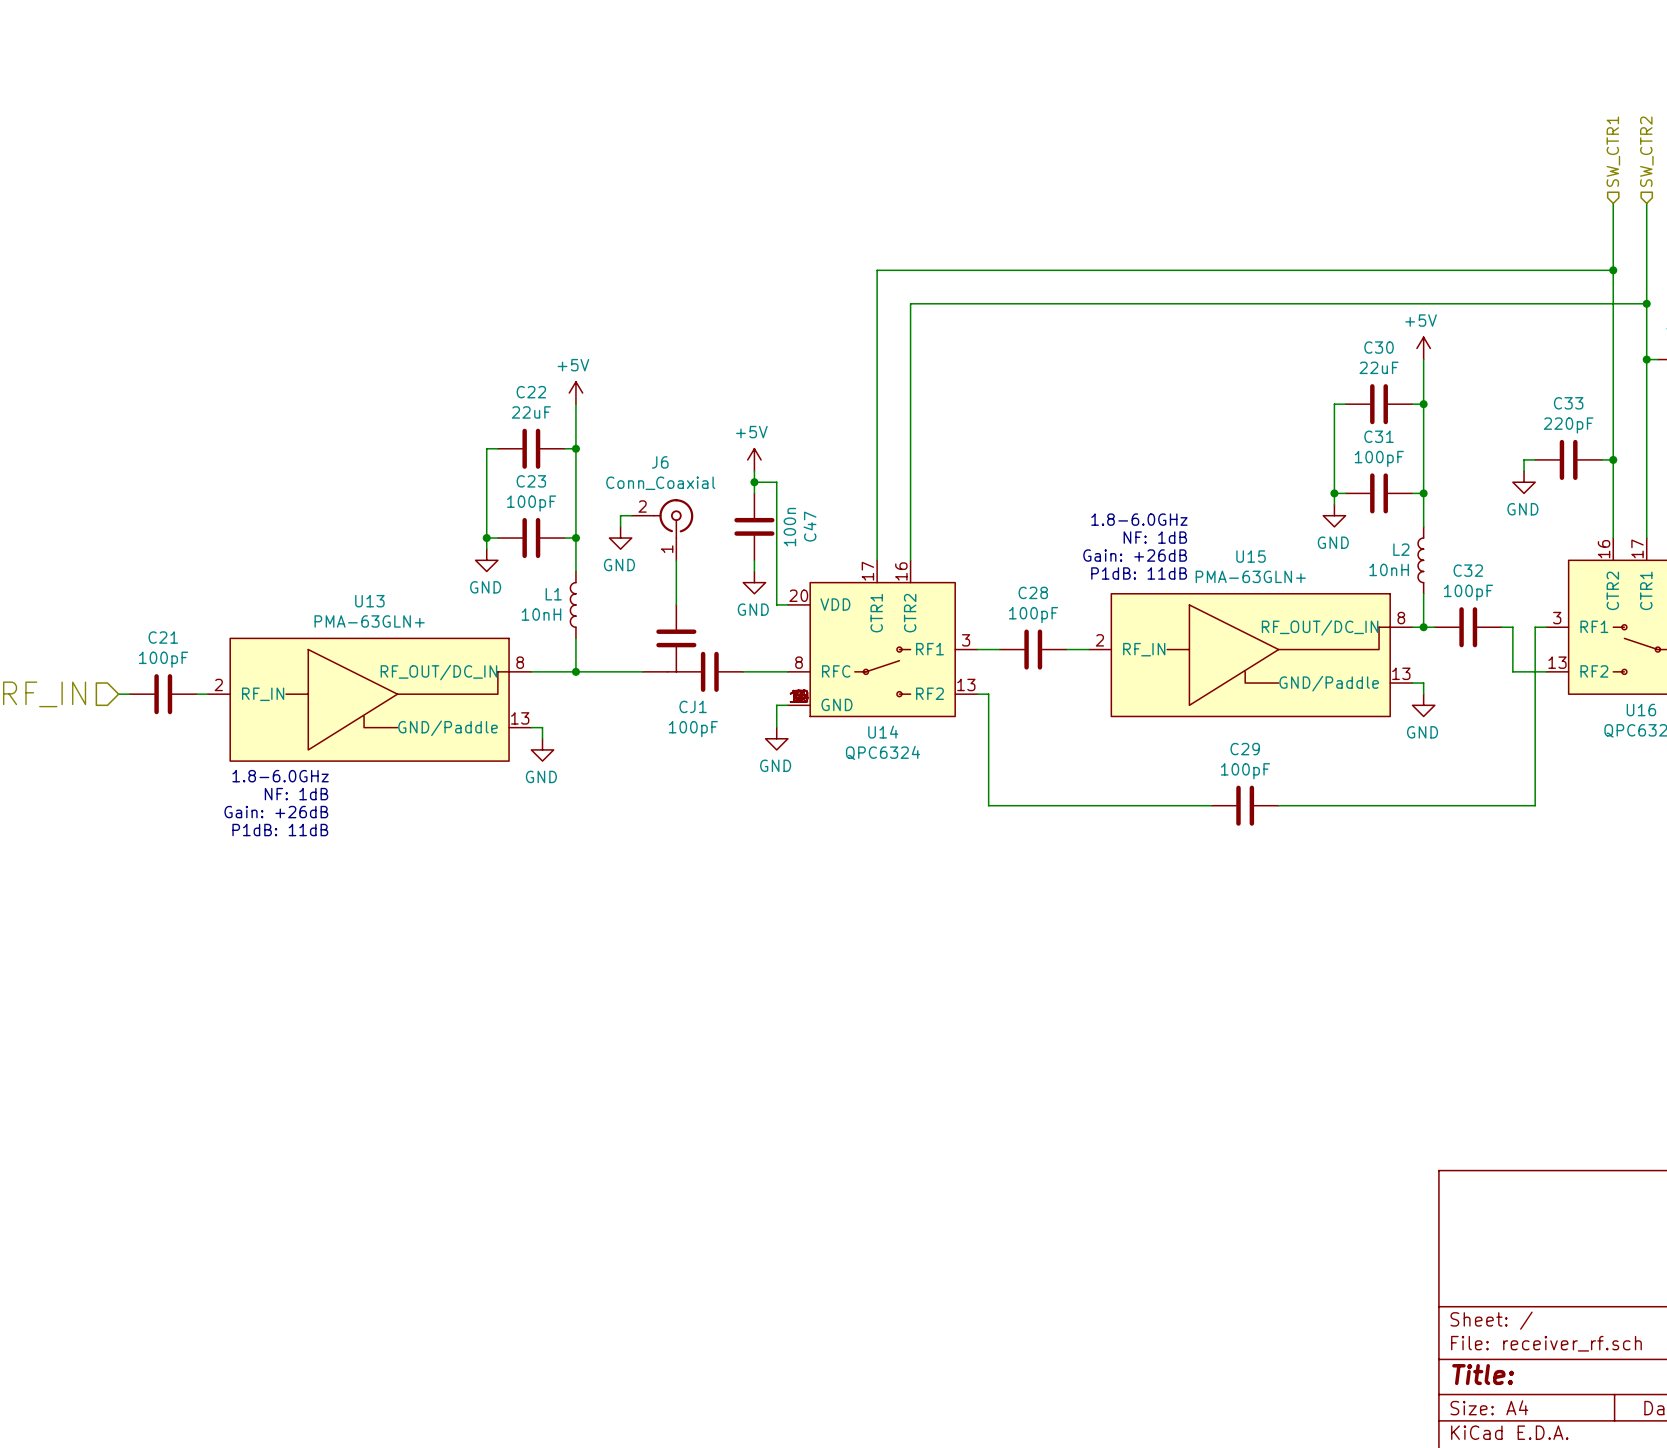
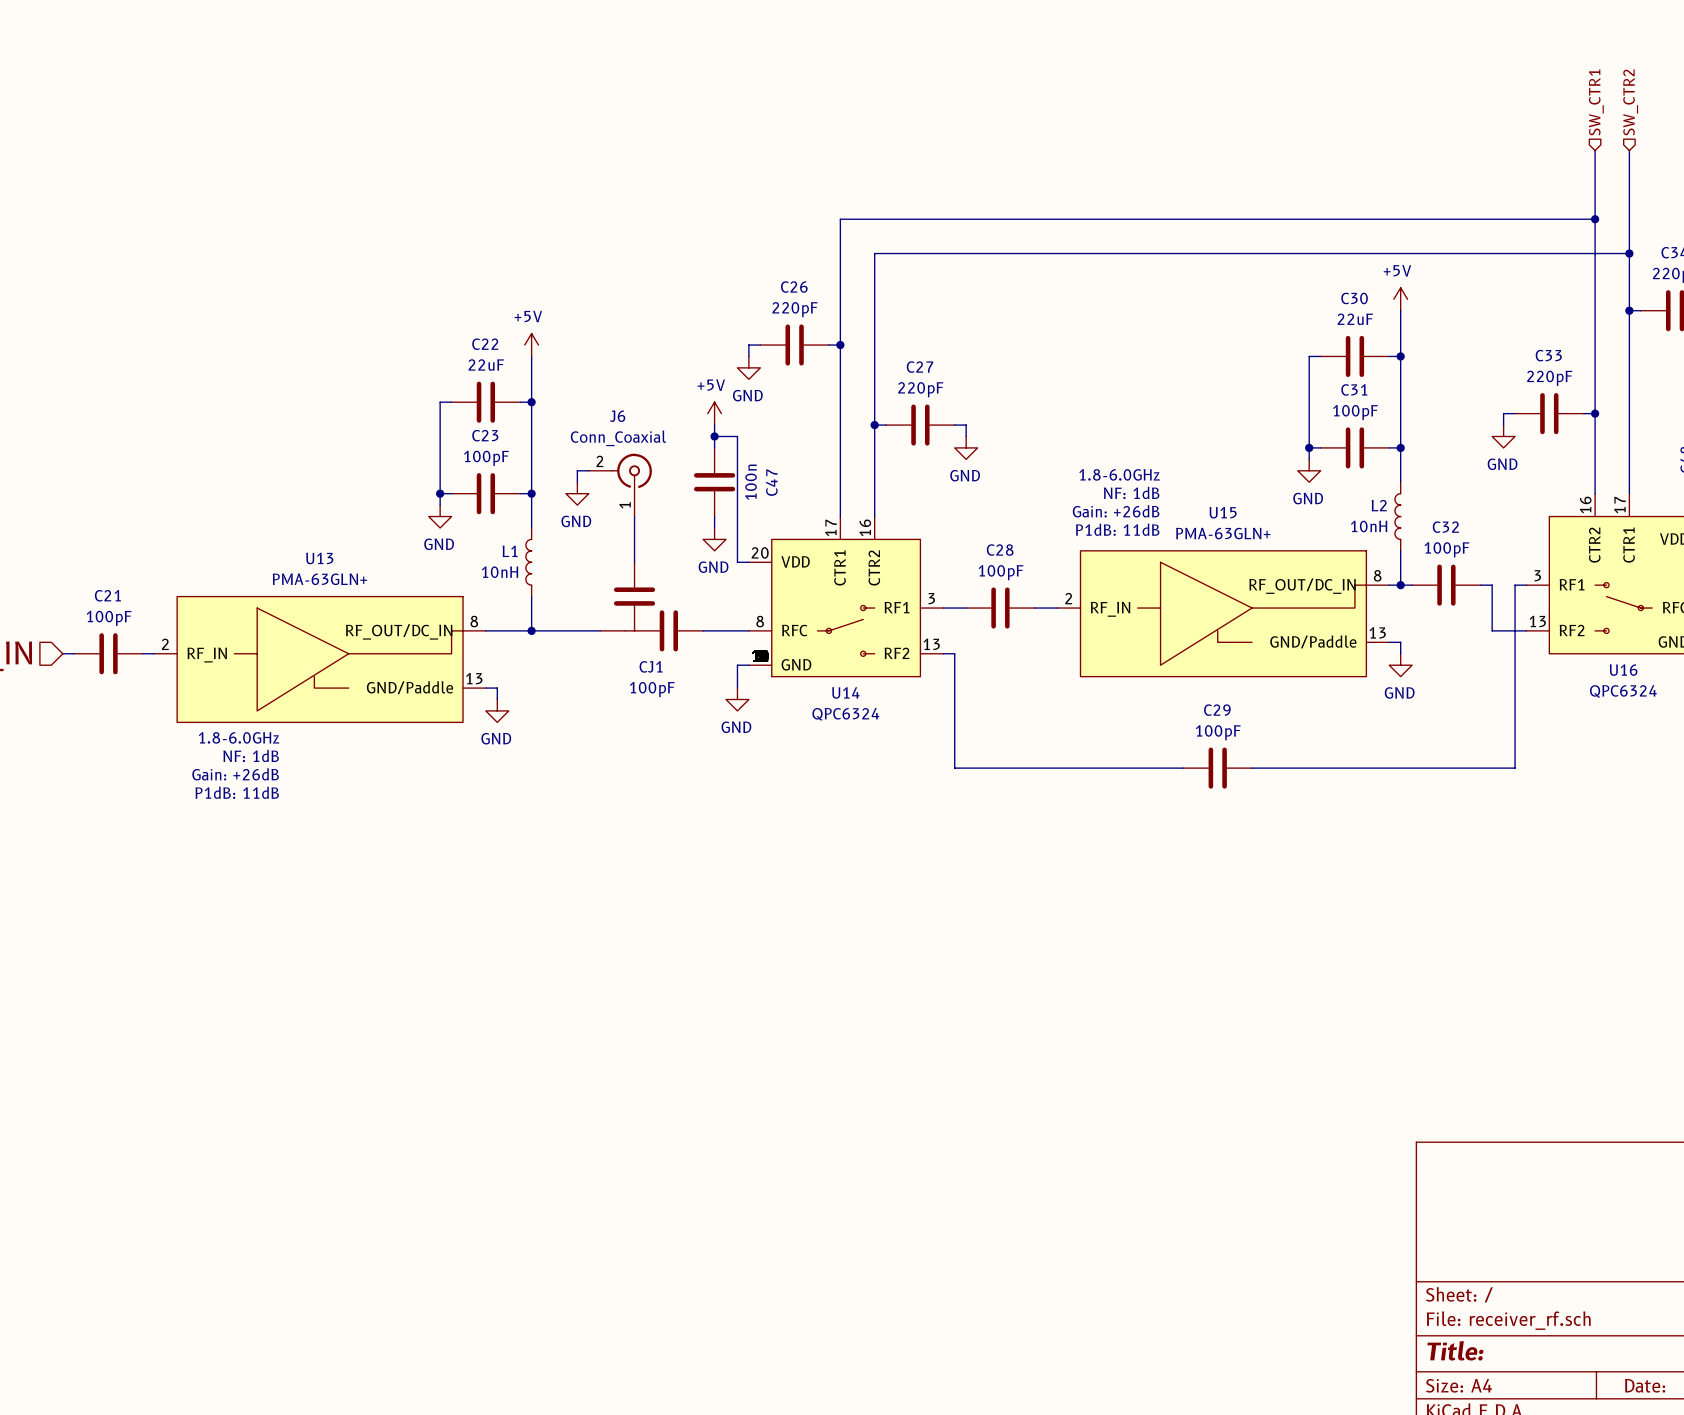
wire: none -> (760, 345) (748, 345) (748, 356)
C26: none -> 220pF (794, 345)
wire: none -> (828, 345) (840, 345)
junction: none -> (840, 345)
power symbol: none -> GND (748, 367)
wire: none -> (874, 425) (886, 425)
junction: none -> (874, 425)
C27: none -> 220pF (920, 425)
wire: none -> (954, 425) (966, 425) (966, 436)
power symbol: none -> GND (966, 447)

